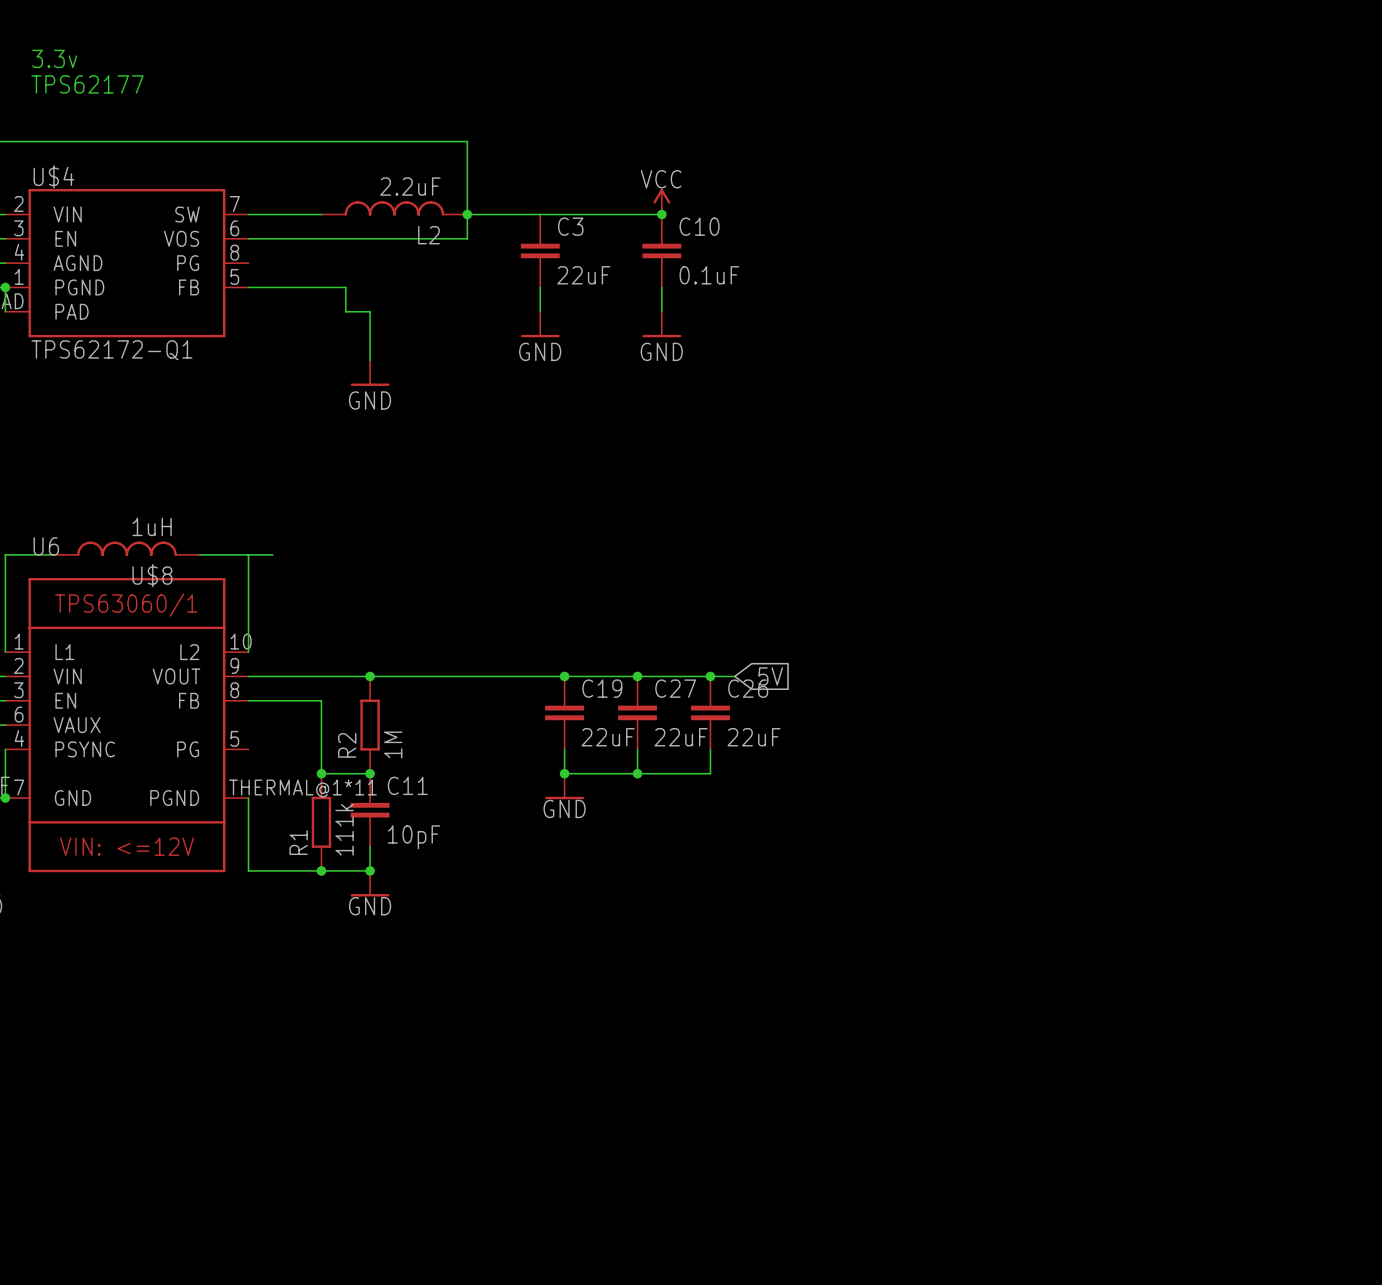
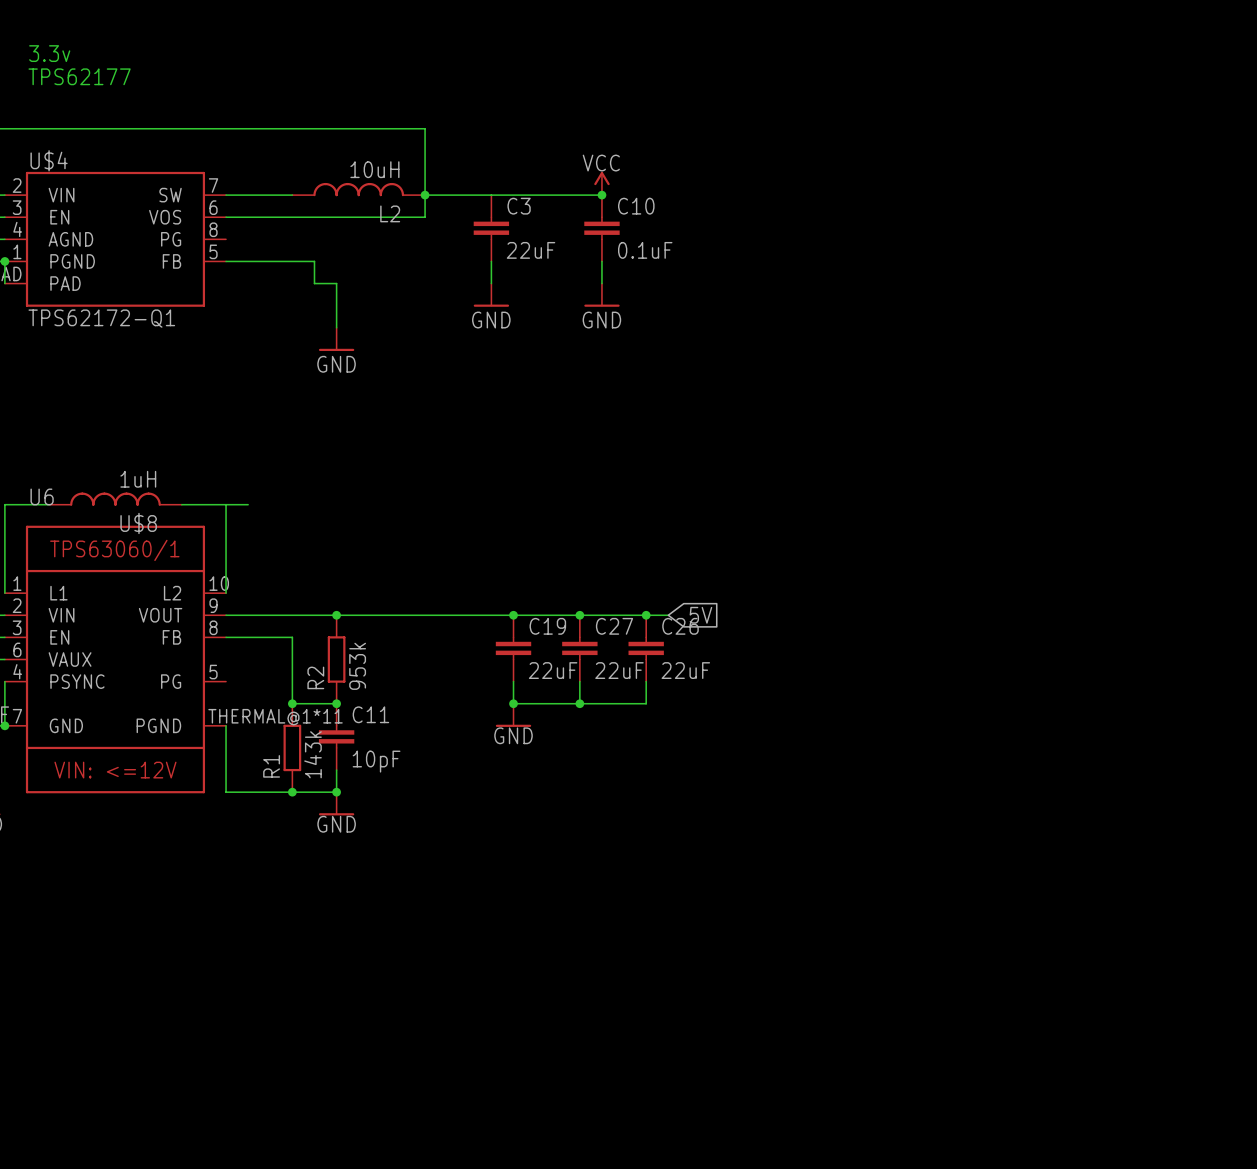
L2 value: 2.2uF (410, 186) -> 10uH (374, 169)
R2 value: 1M (393, 744) -> 953k (357, 666)
R1 value: 111k (344, 829) -> 143k (313, 754)

